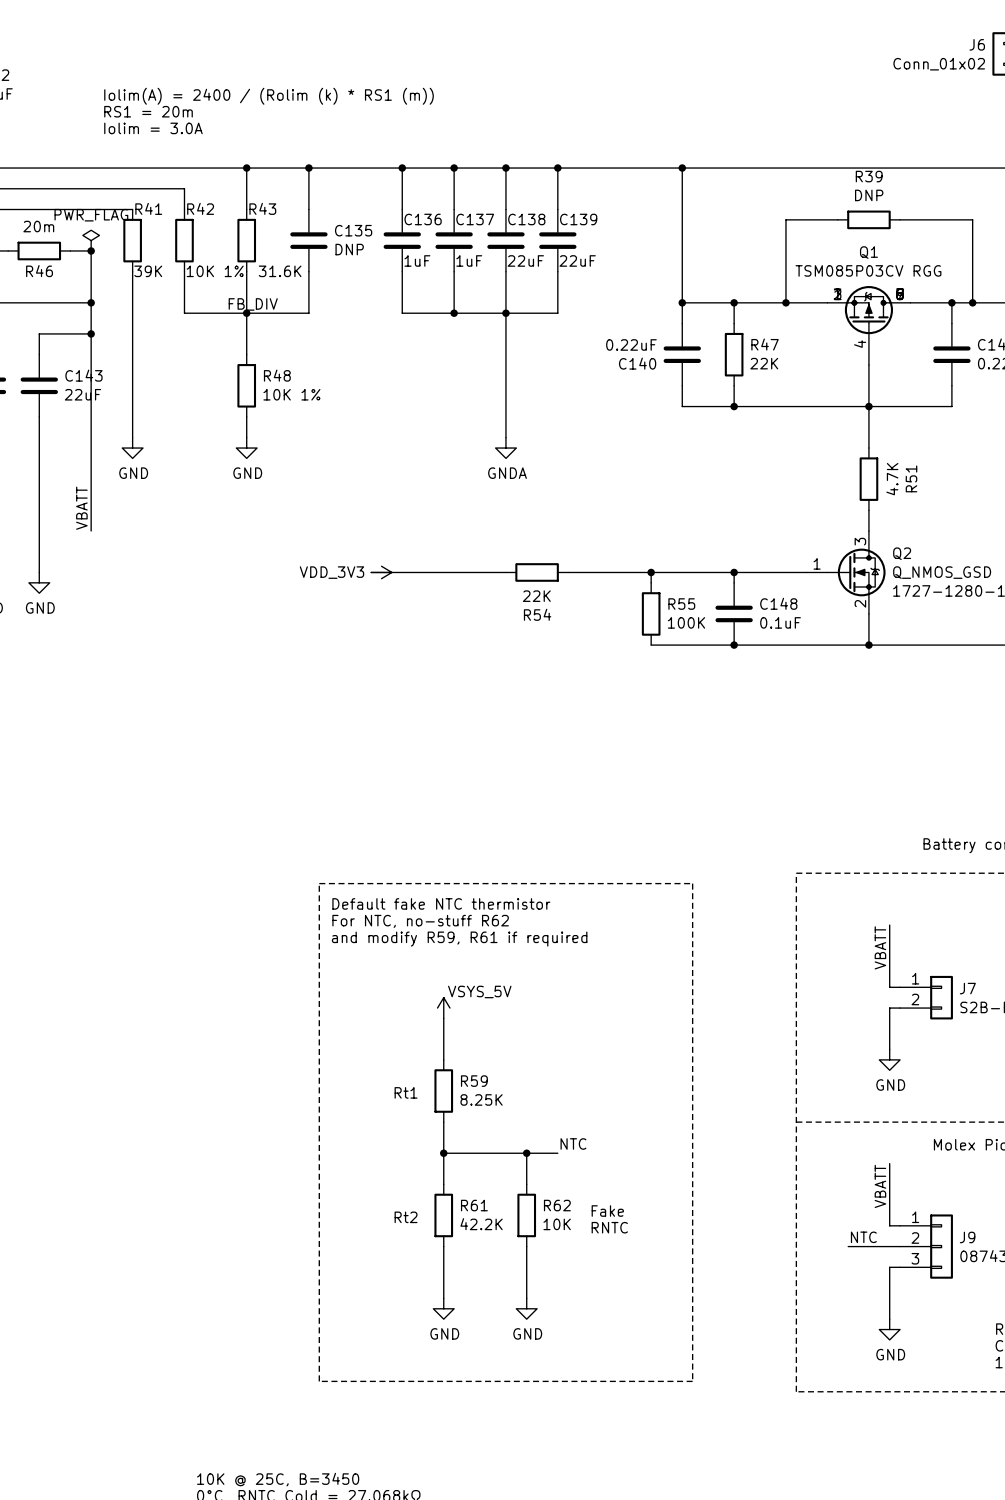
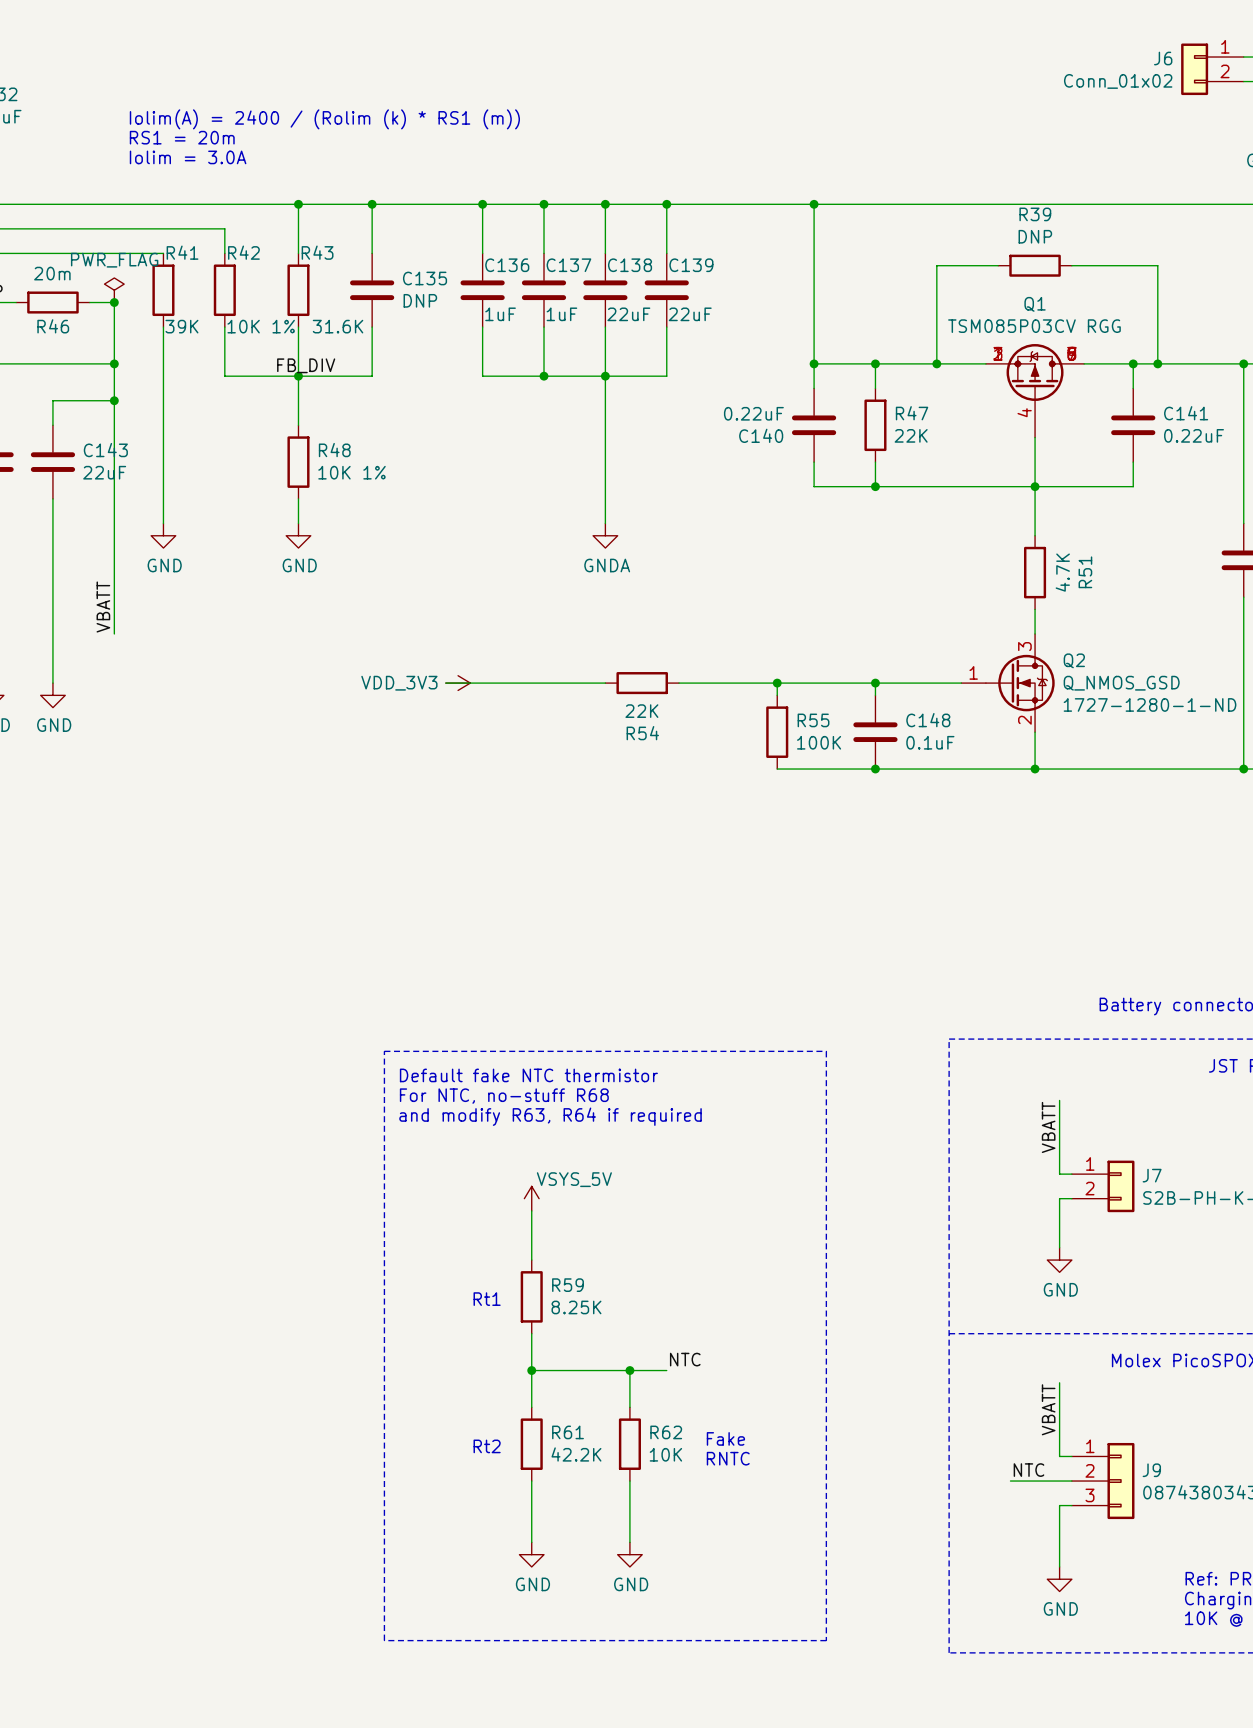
text: For NTC, no-stuff R62 (420, 921) -> For NTC, no-stuff R68 (504, 1096)
text: and modify R59, R61 if required (459, 939) -> and modify R63, R64 if required (550, 1116)

